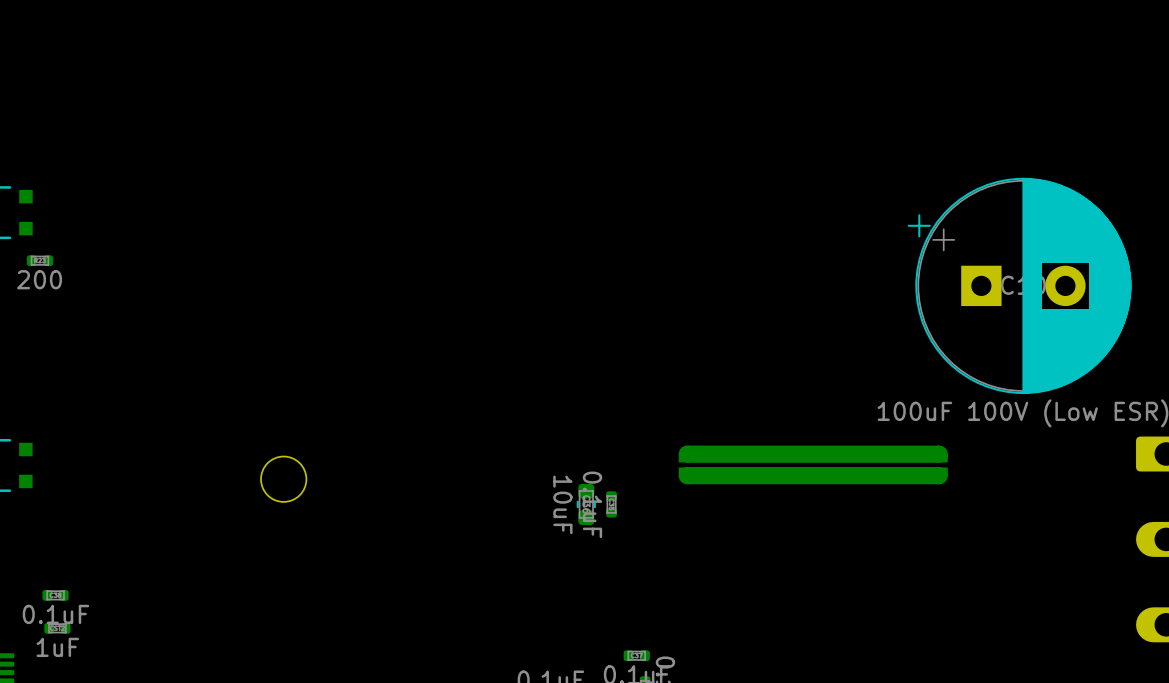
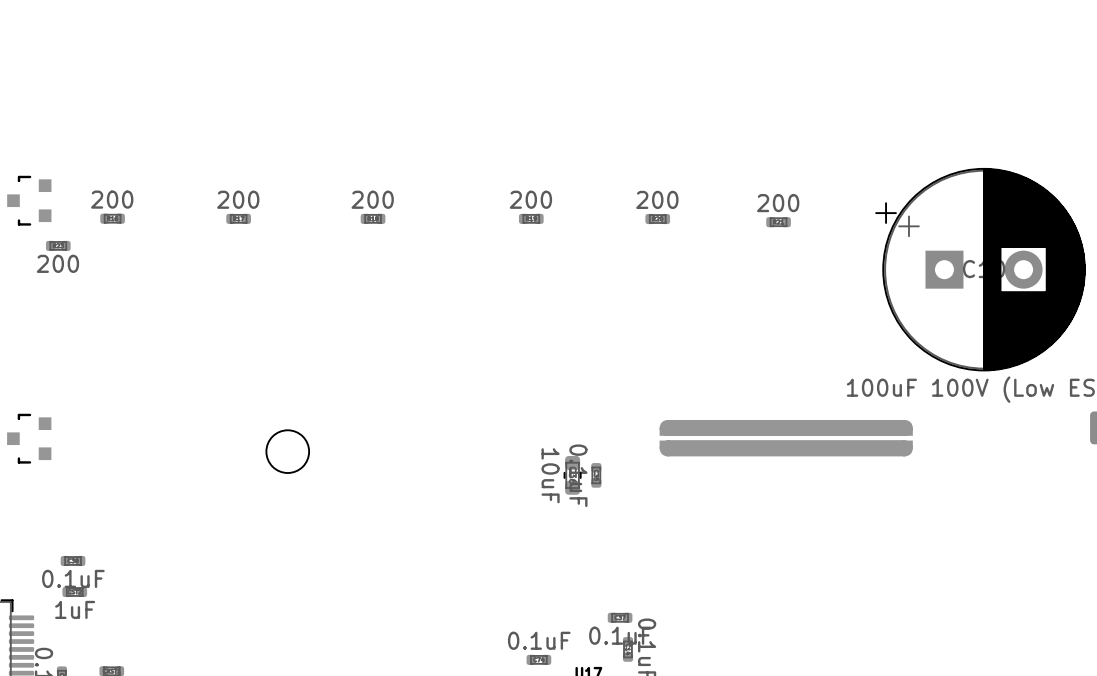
part: none -> 200 (112, 218)
part: none -> 200 (238, 218)
part: none -> 200 (373, 218)
part: none -> 200 (531, 218)
part: none -> 200 (657, 219)
part: none -> 200 (778, 222)

